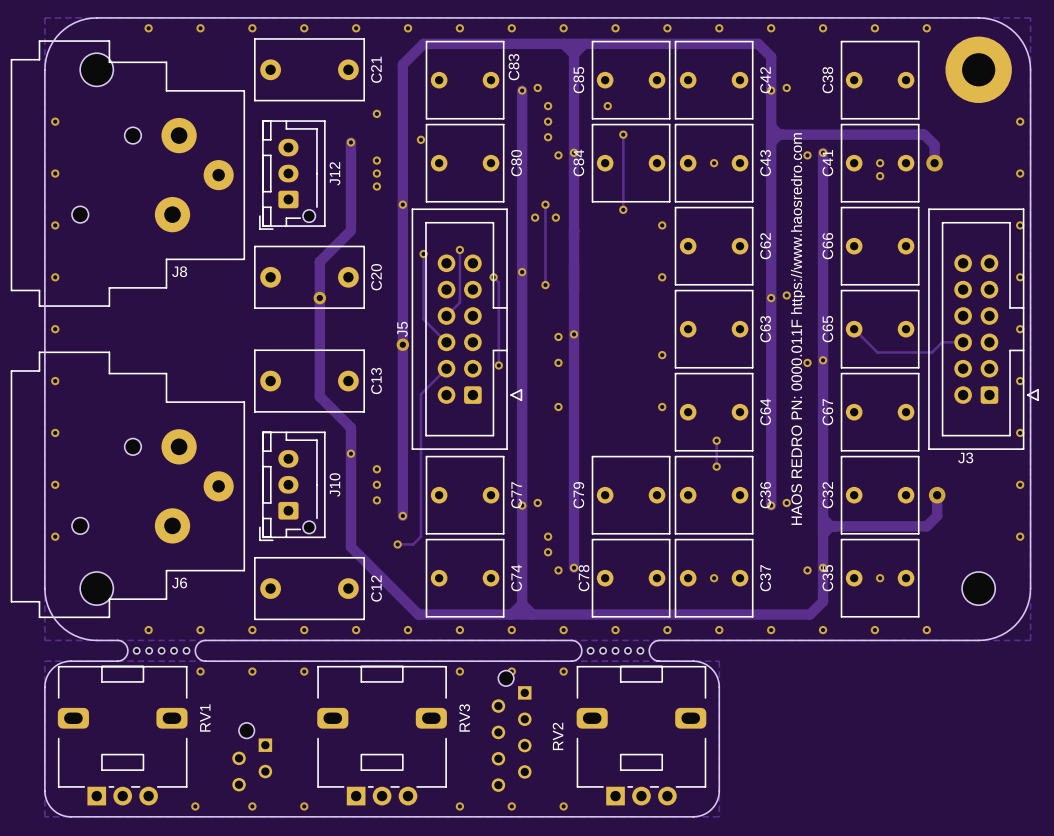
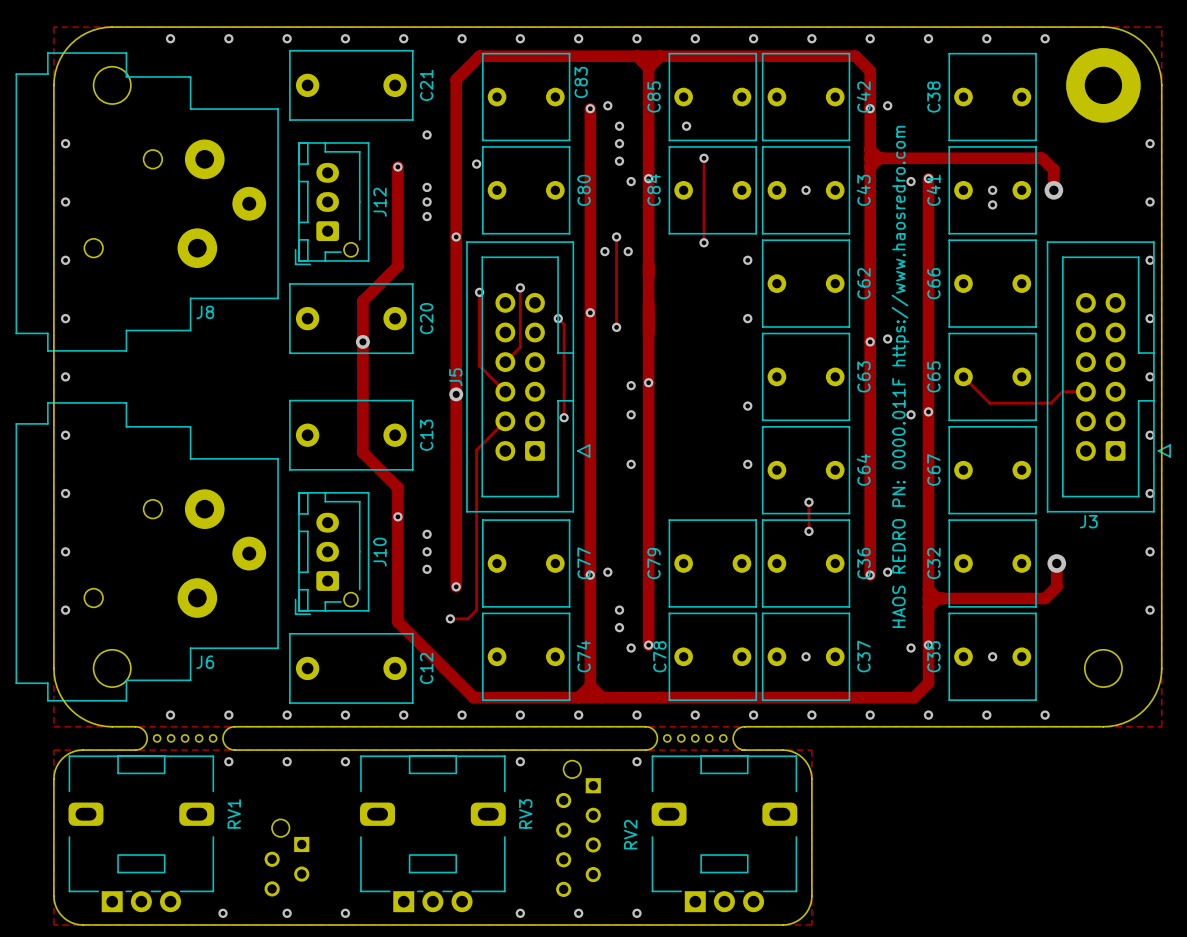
via: (511, 671) -> none

